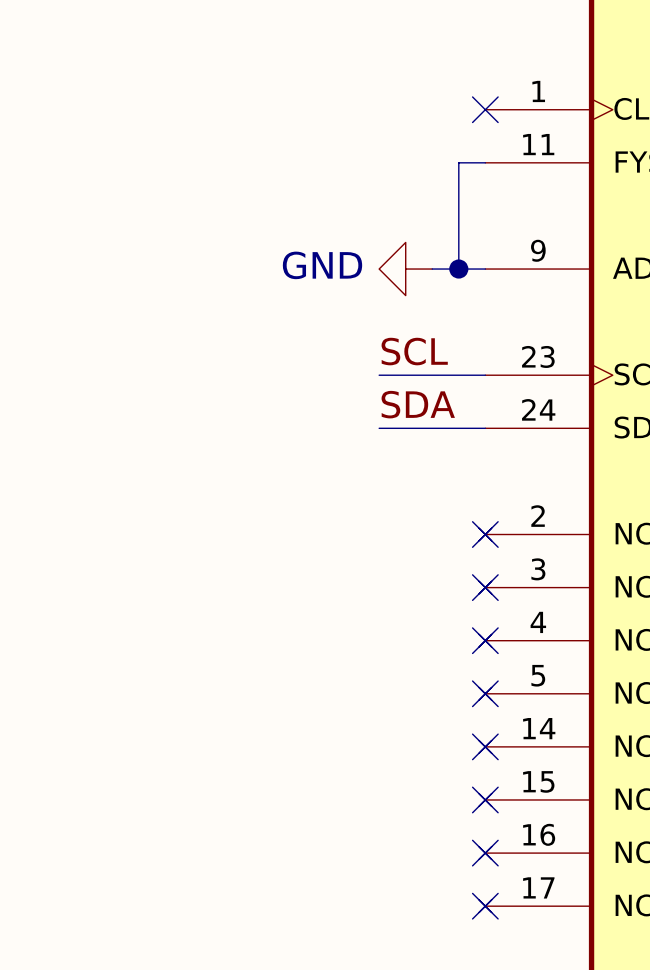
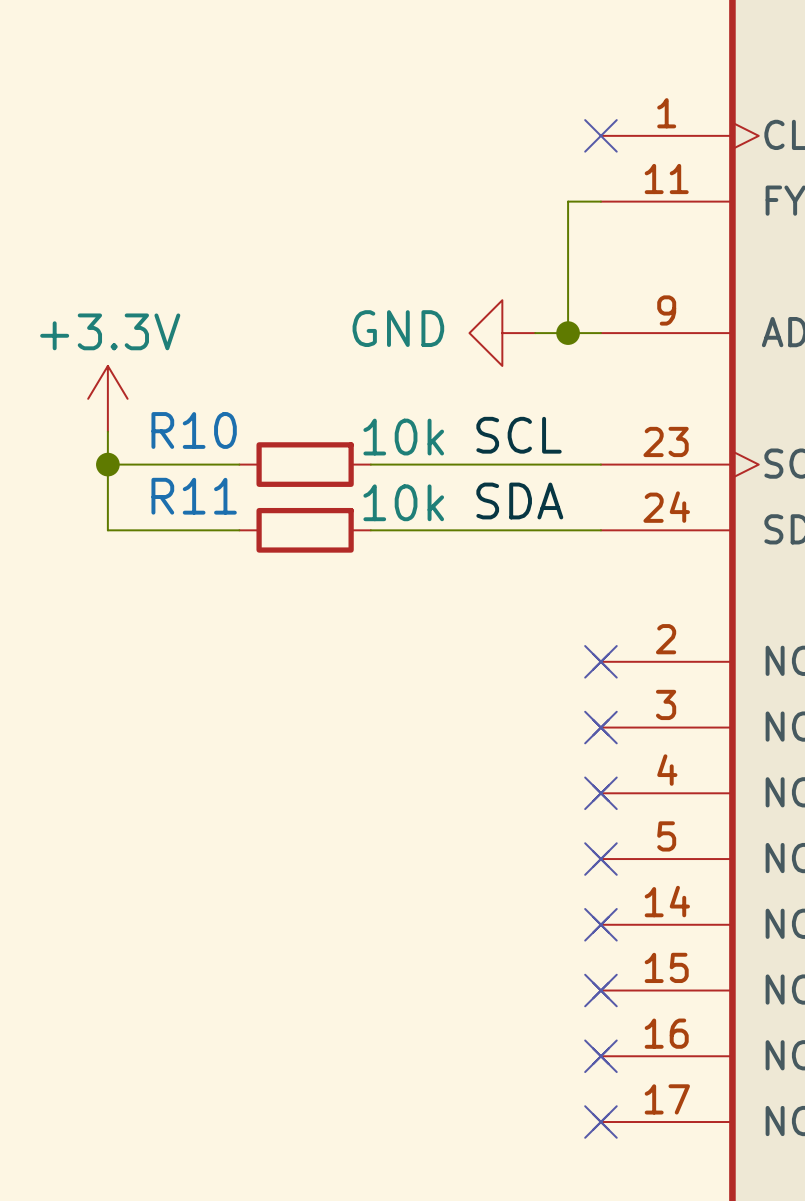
power symbol: none -> +3.3V (107, 398)
wire: none -> (107, 431) (107, 530) (239, 530)
wire: none -> (107, 464) (239, 464)
junction: none -> (107, 464)
R10: none -> 10k (305, 464)
wire: none -> (370, 464) (469, 464)
R11: none -> 10k (305, 530)
wire: none -> (370, 530) (469, 530)

